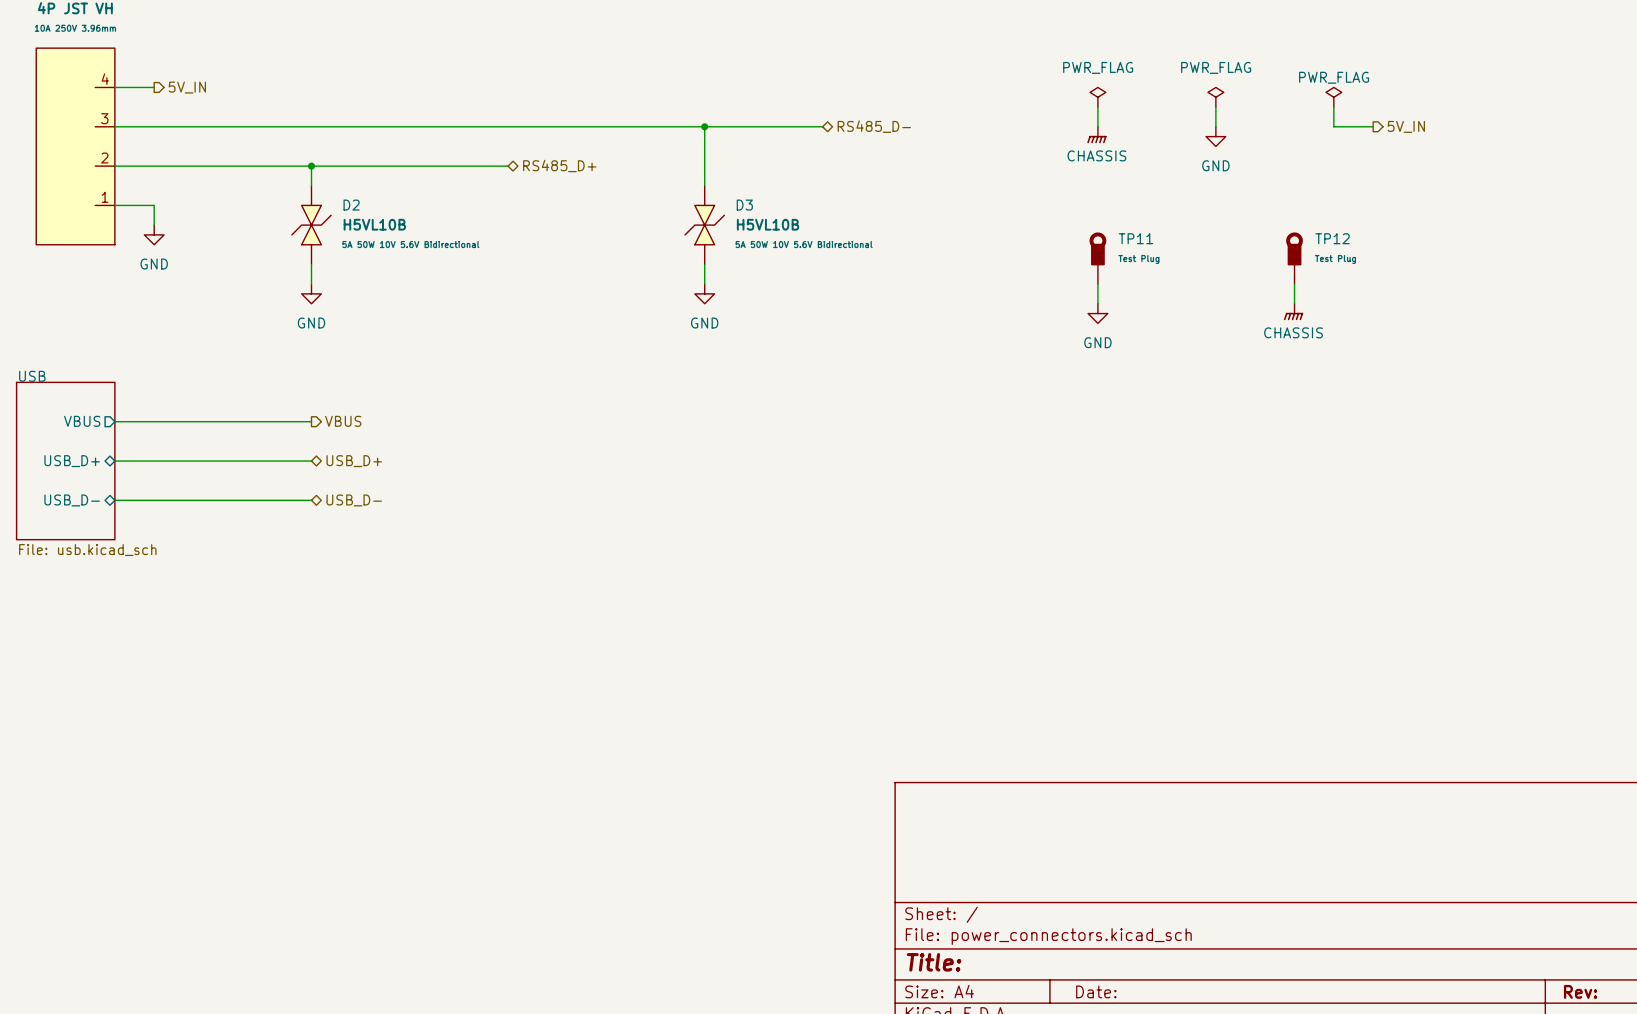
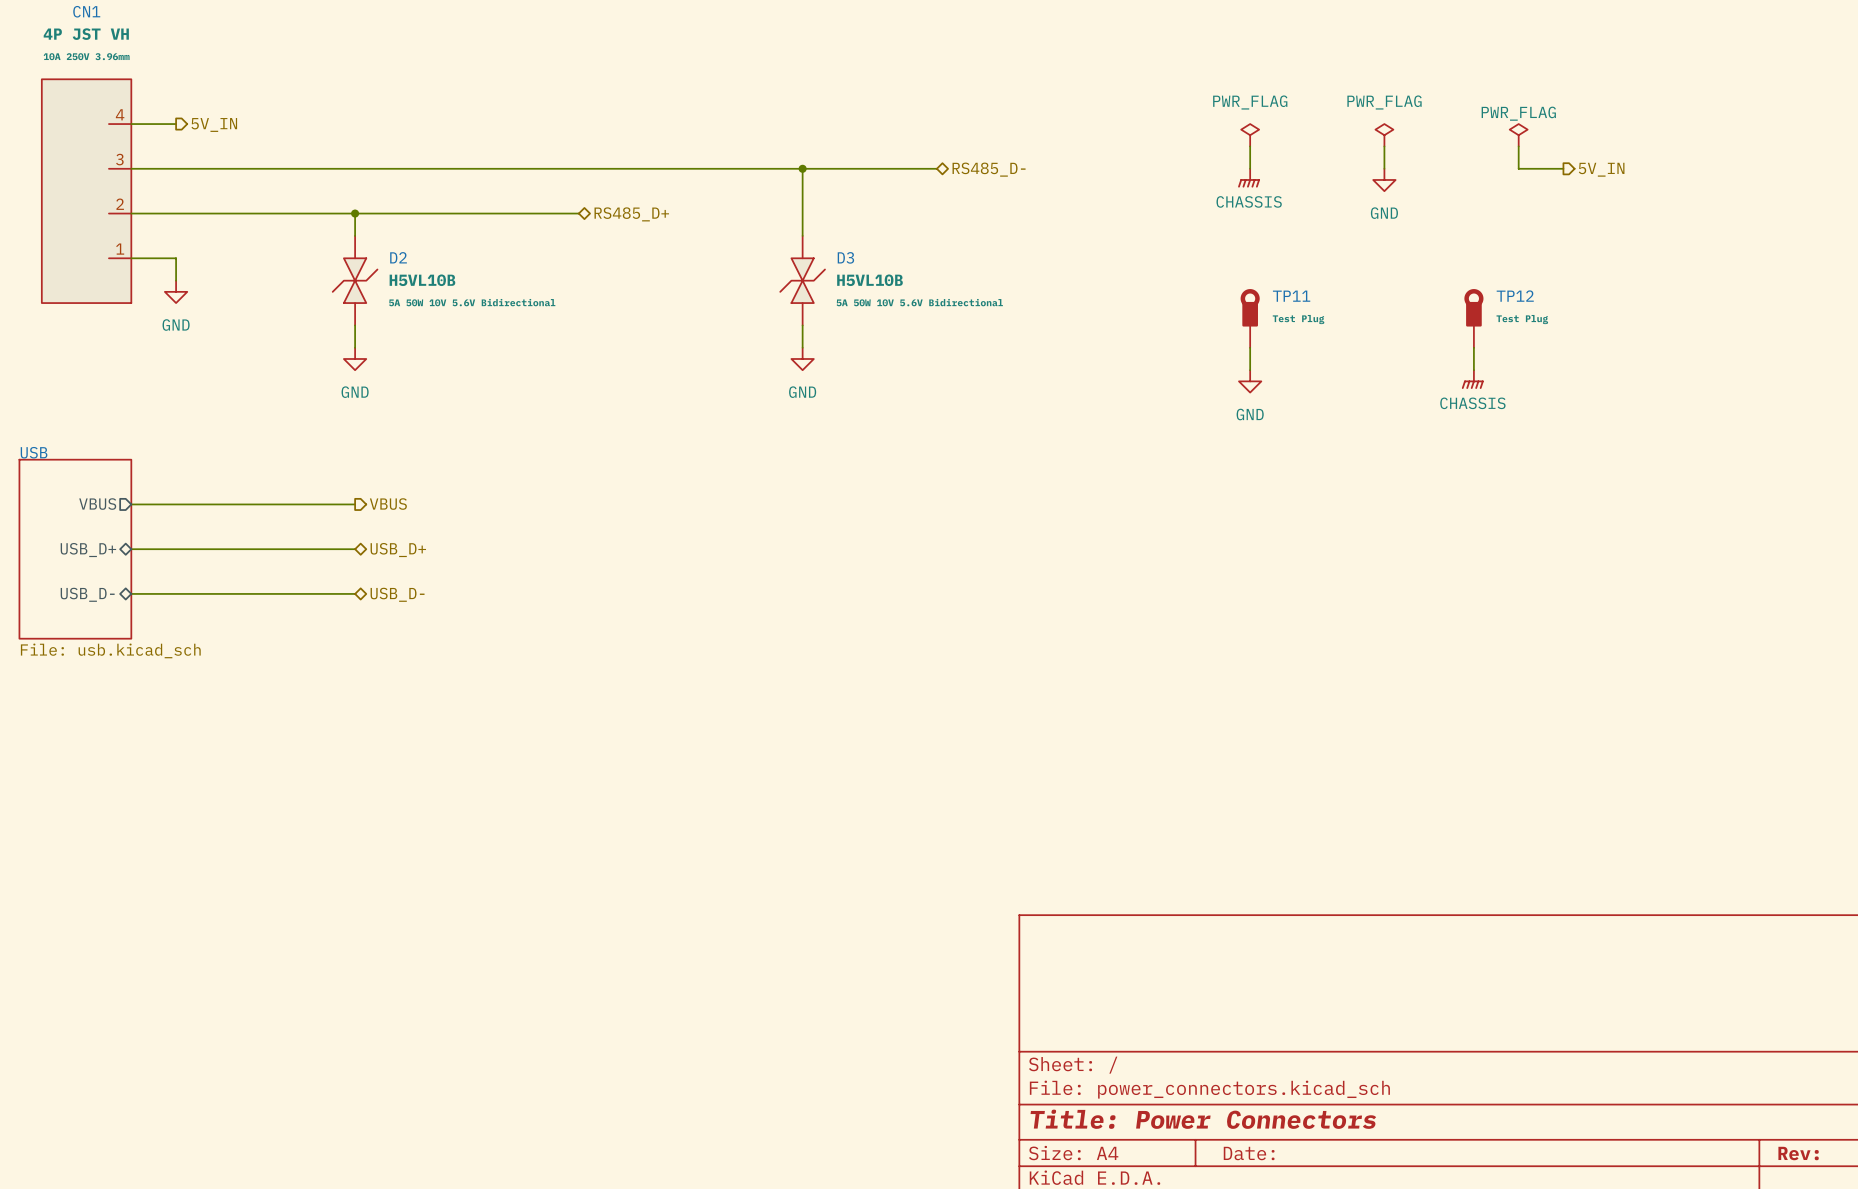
title block: Title: (934, 962) -> Title: Power Connectors (1203, 1119)

